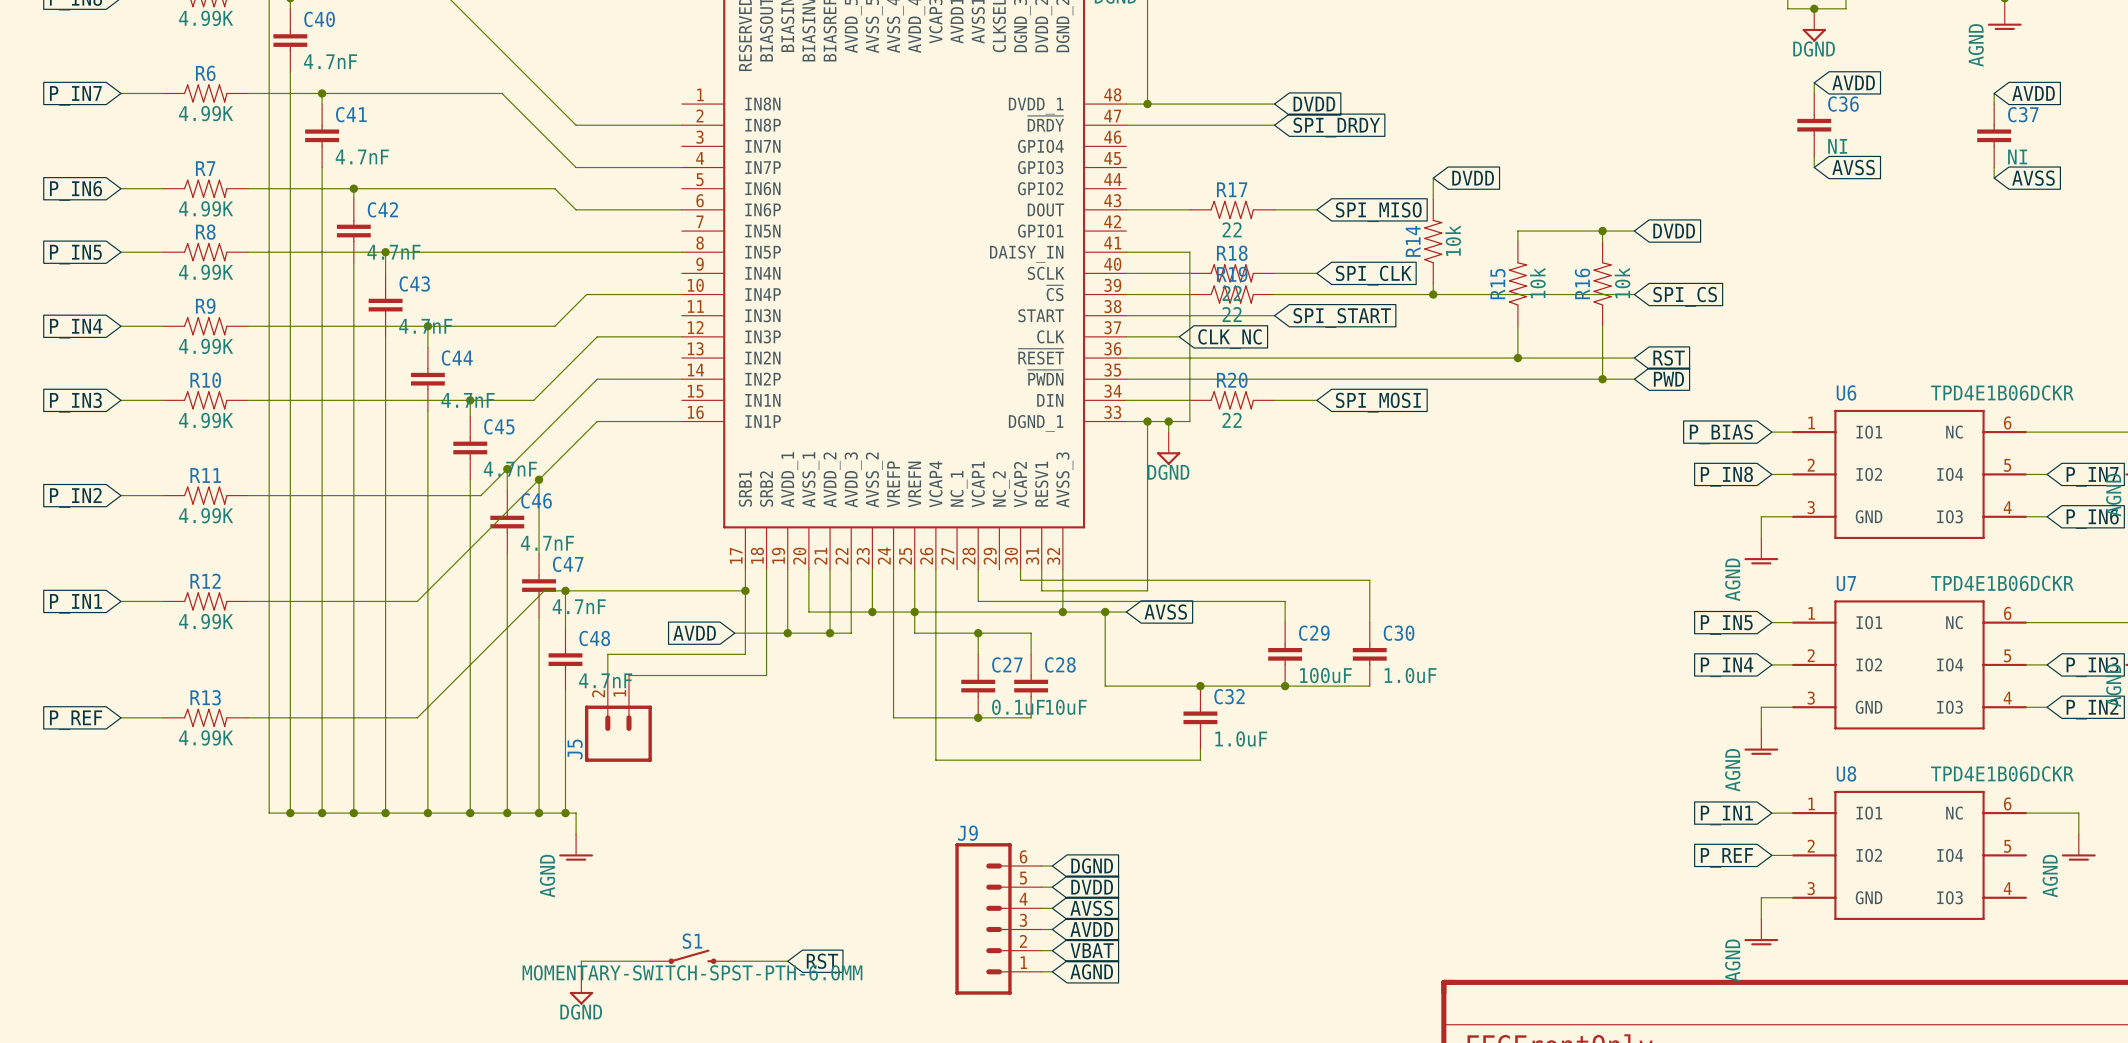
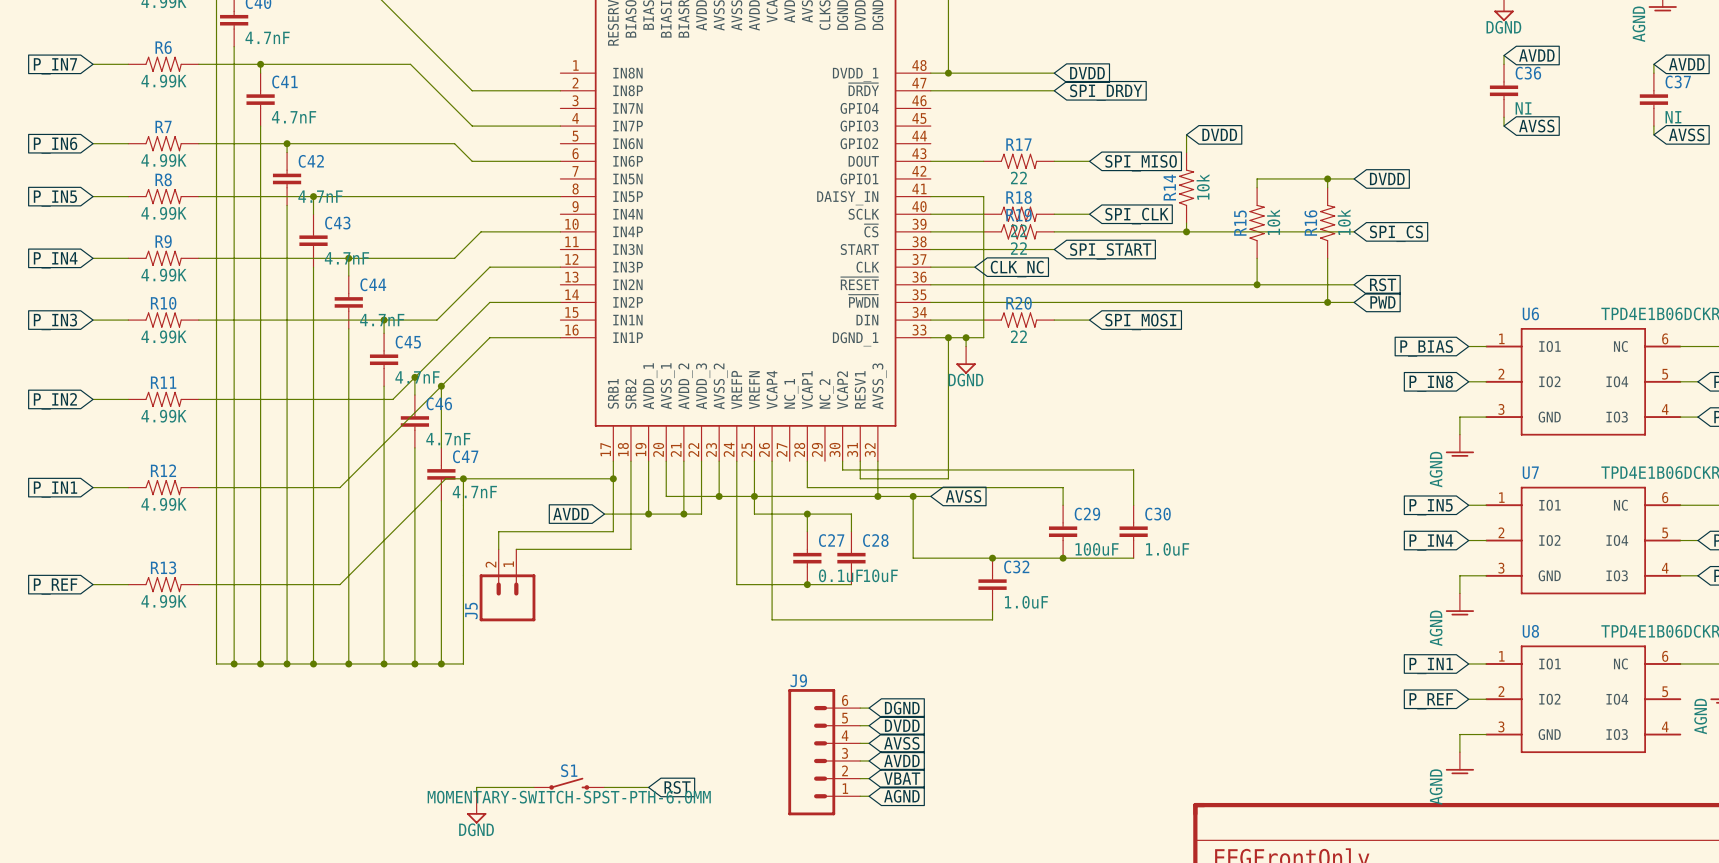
C48: 4.7nF (565, 659) -> none
wire: (565, 813) (576, 813) (576, 834) -> none
junction: (565, 813) -> none
power symbol: AGND (576, 847) -> none

